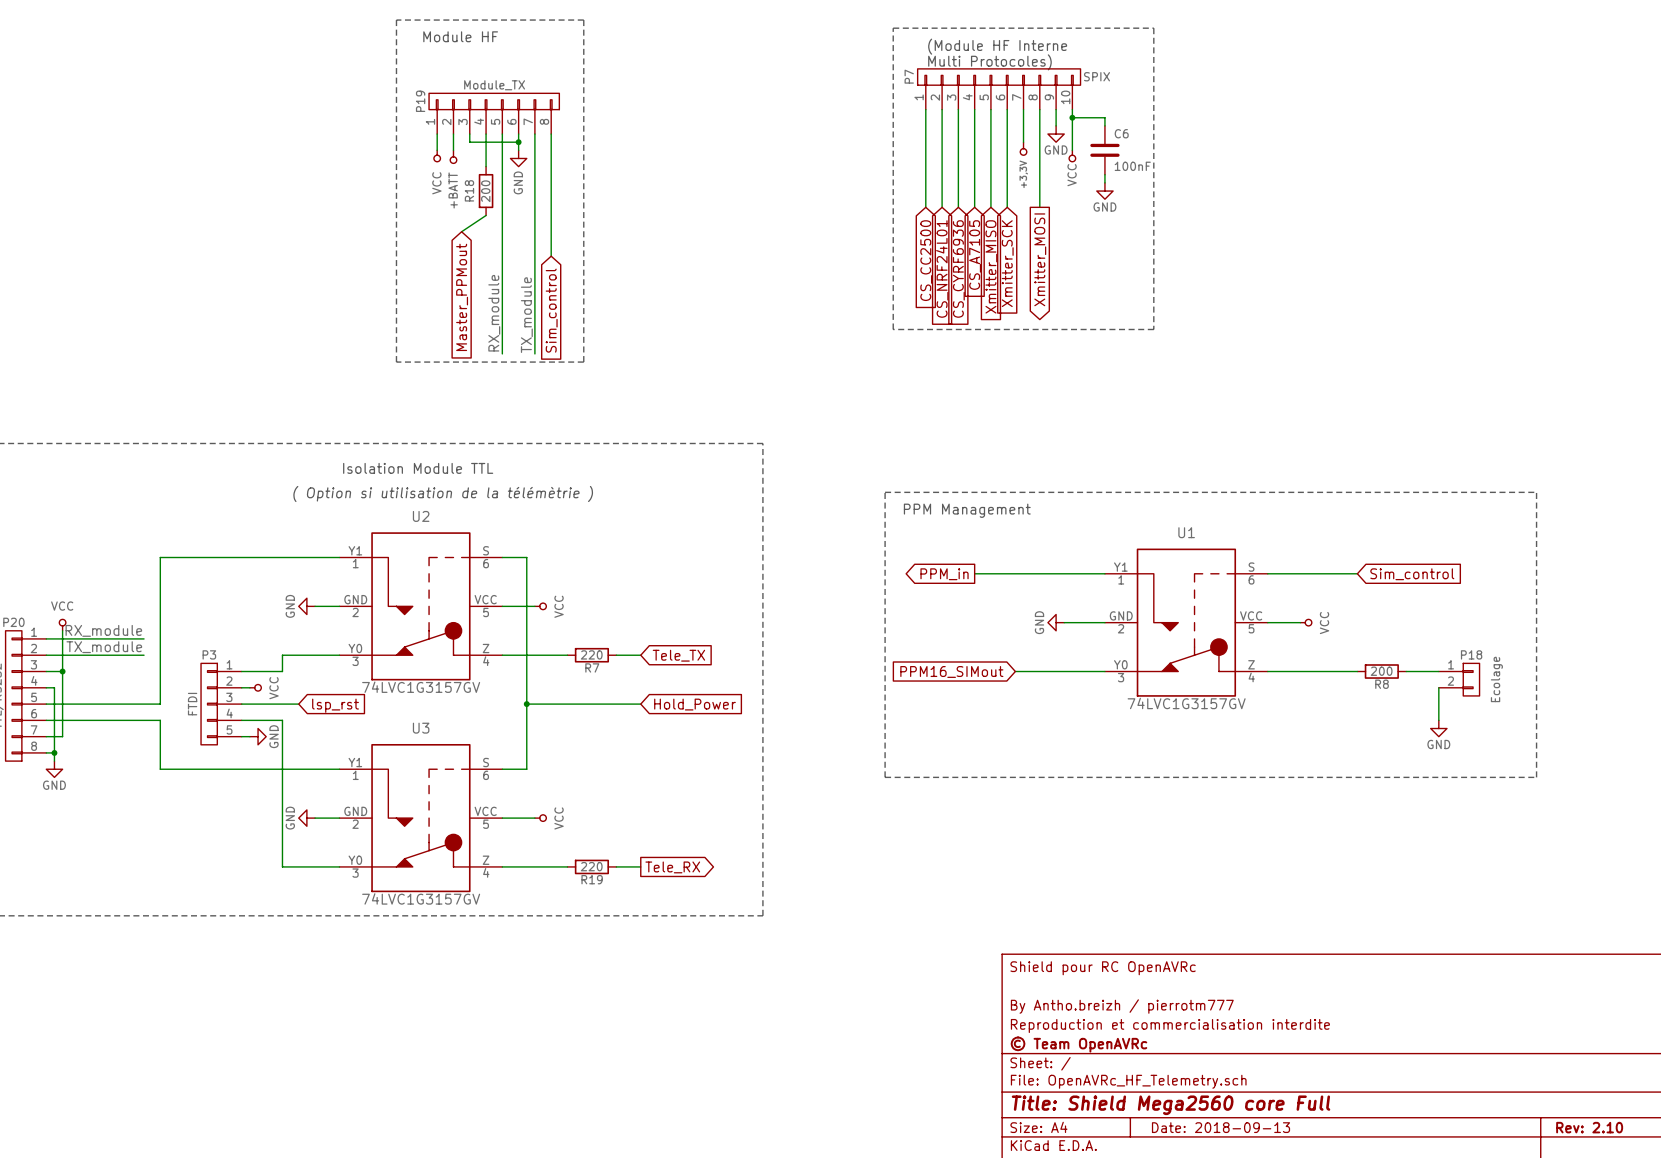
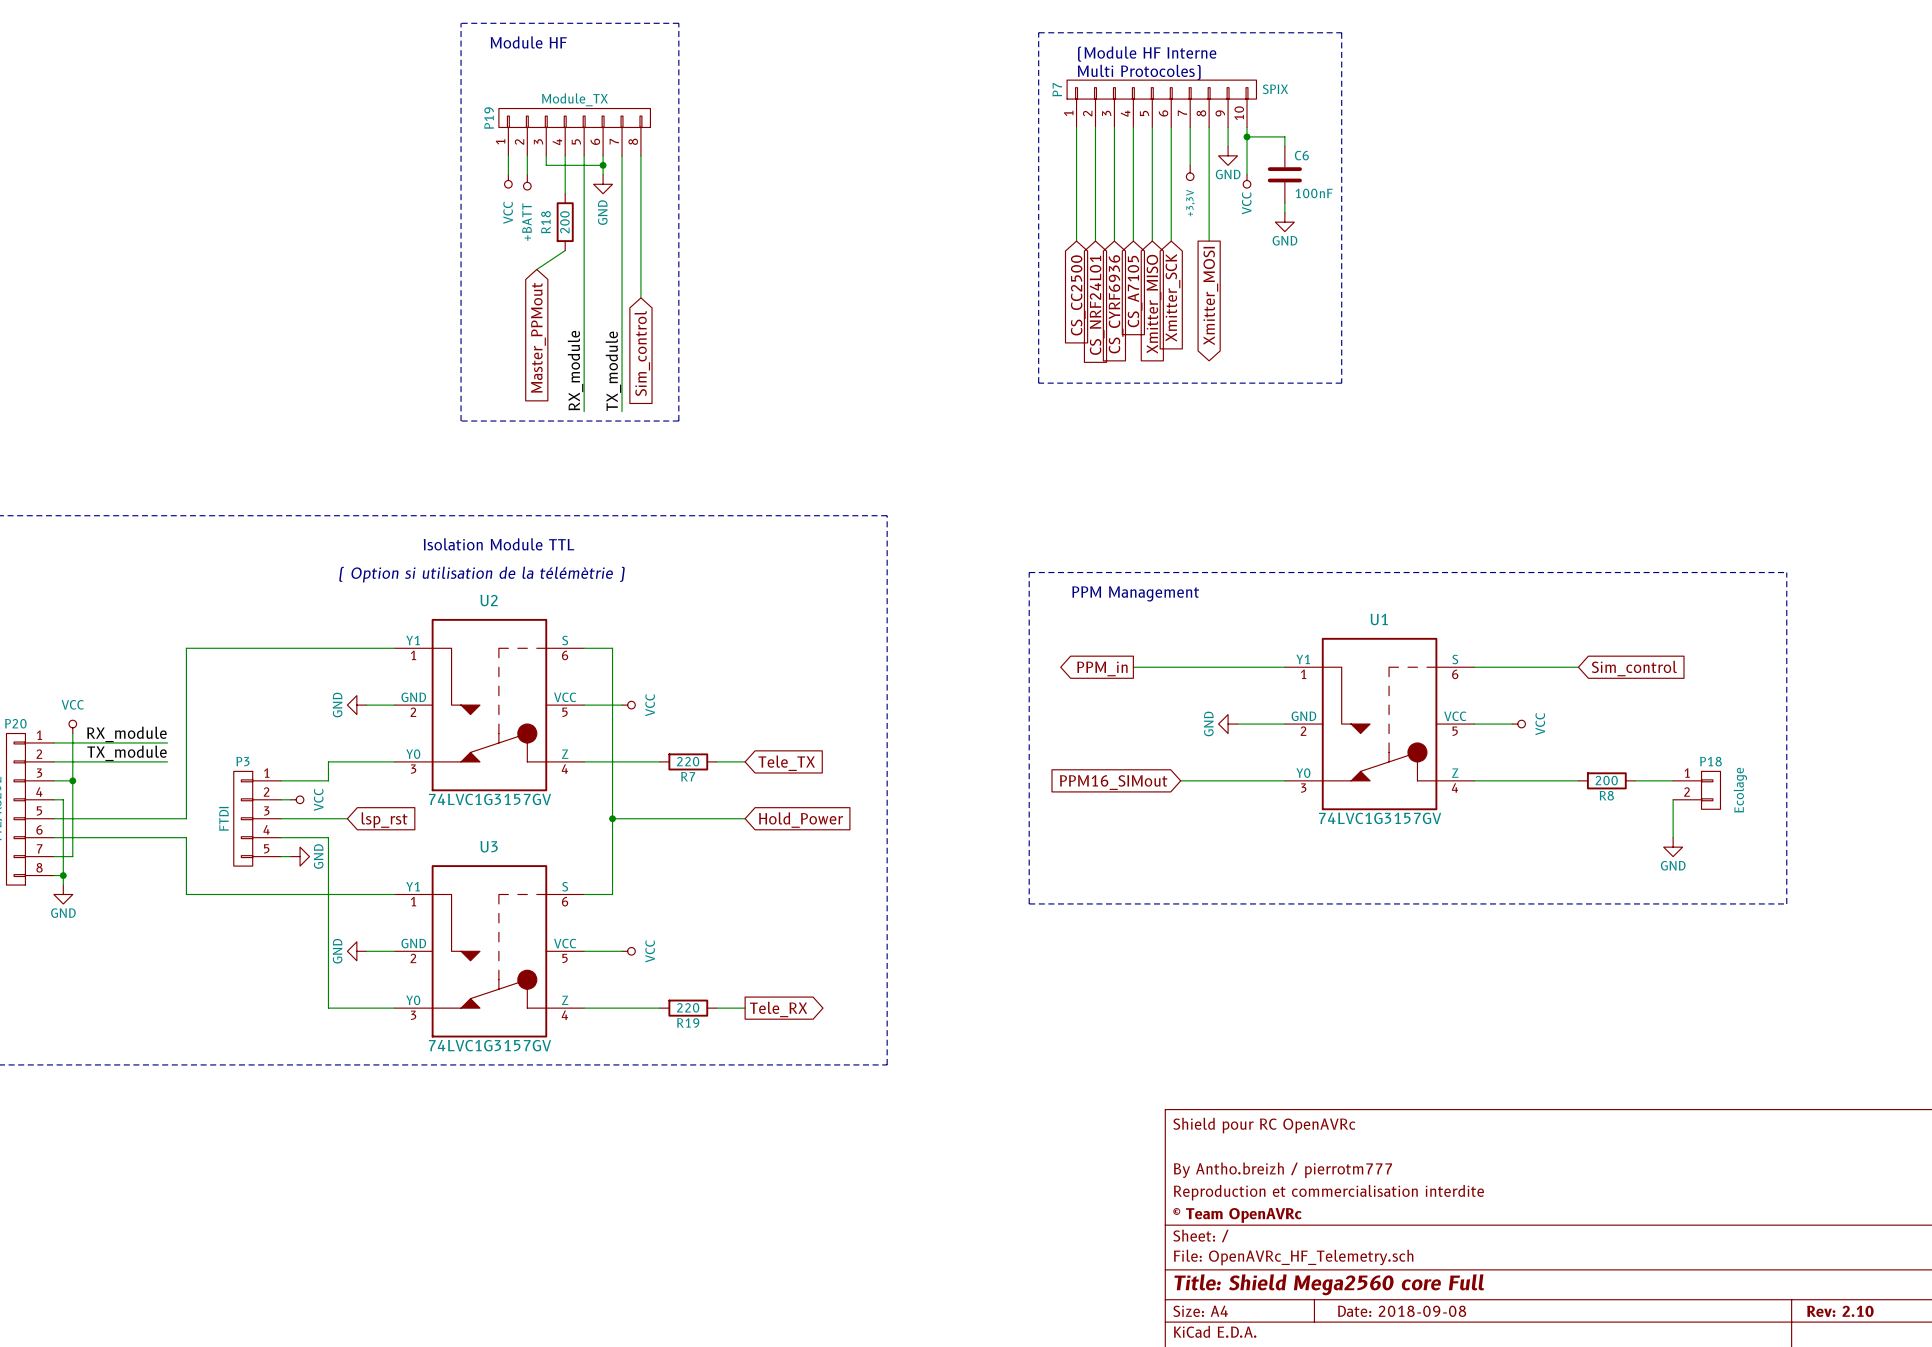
title block: Date: 2018-09-13 (1221, 1127) -> Date: 2018-09-08 (1402, 1311)

